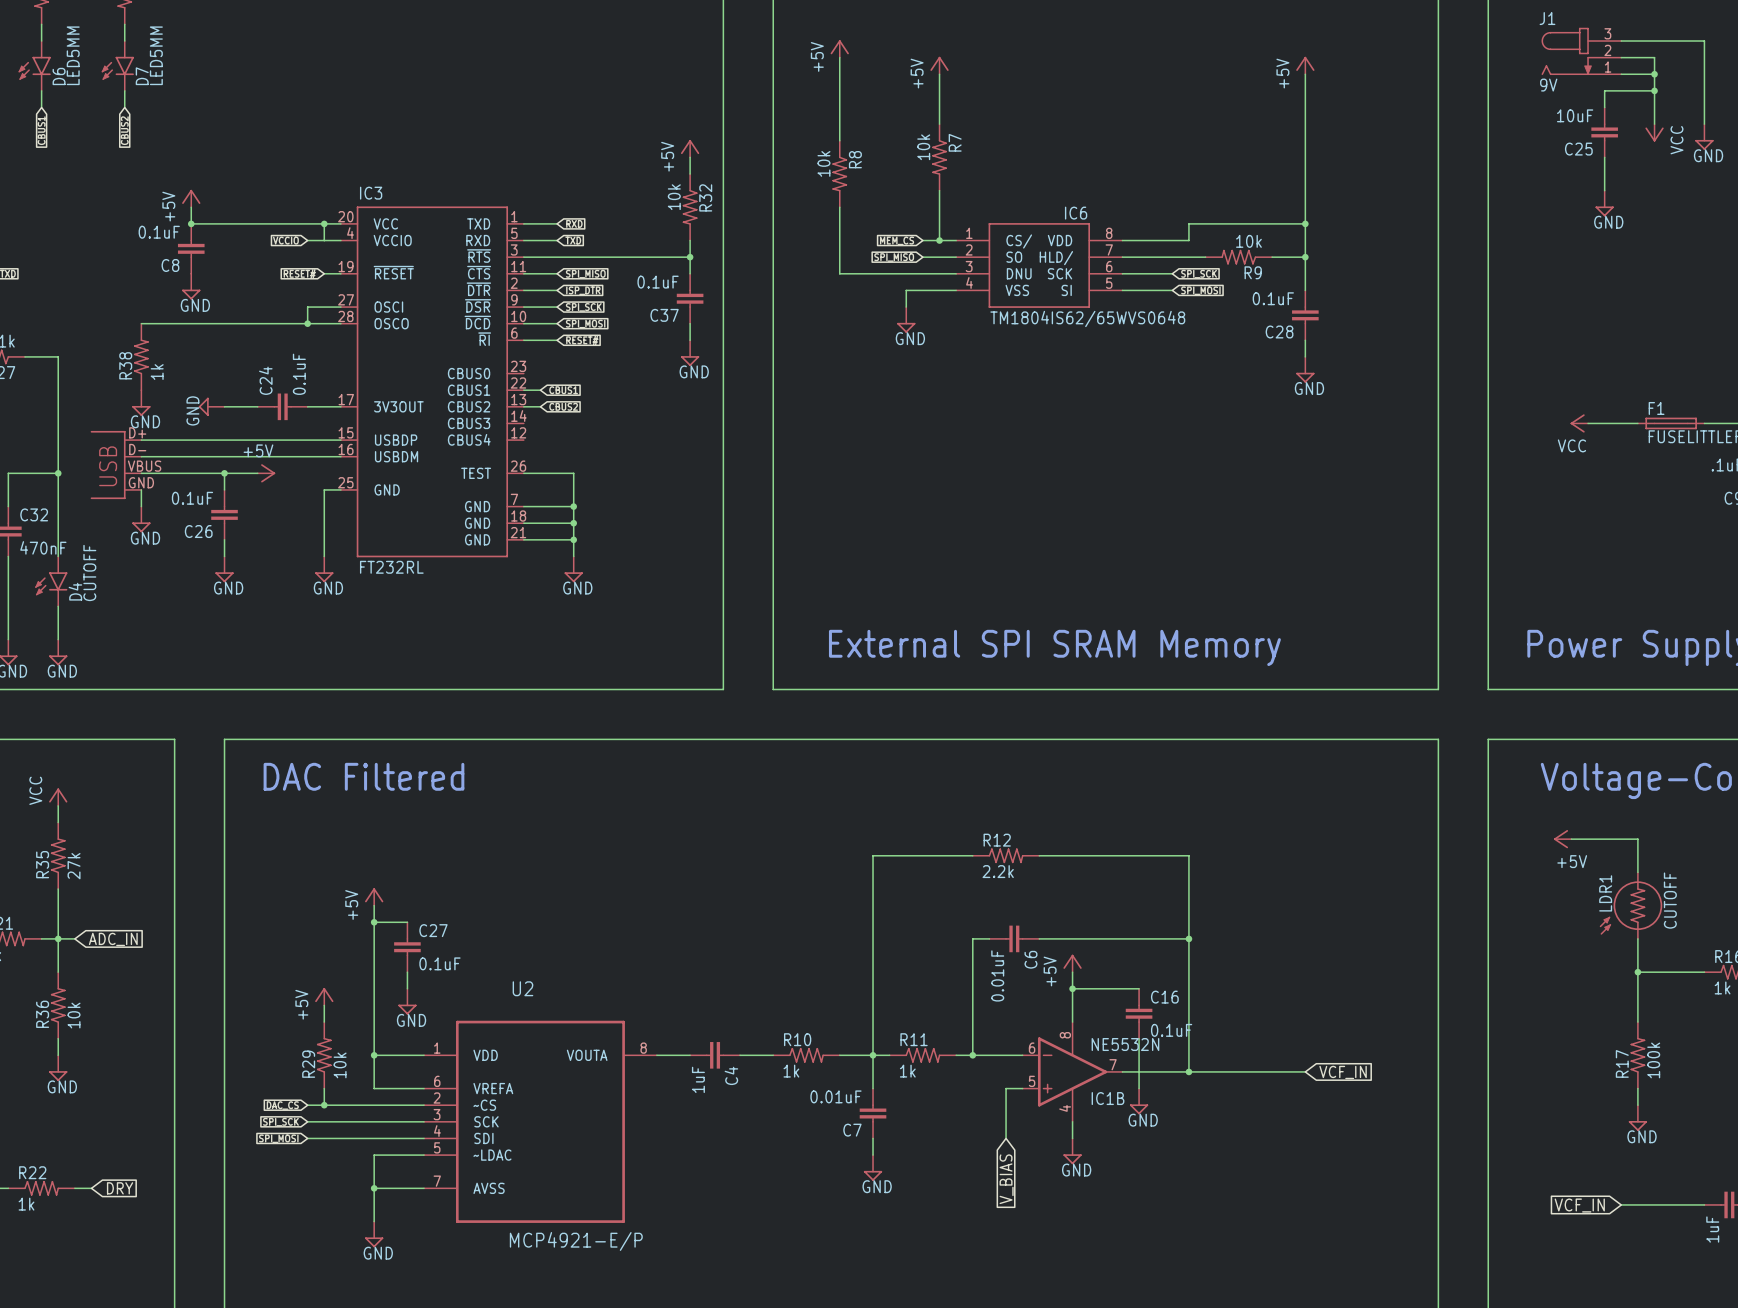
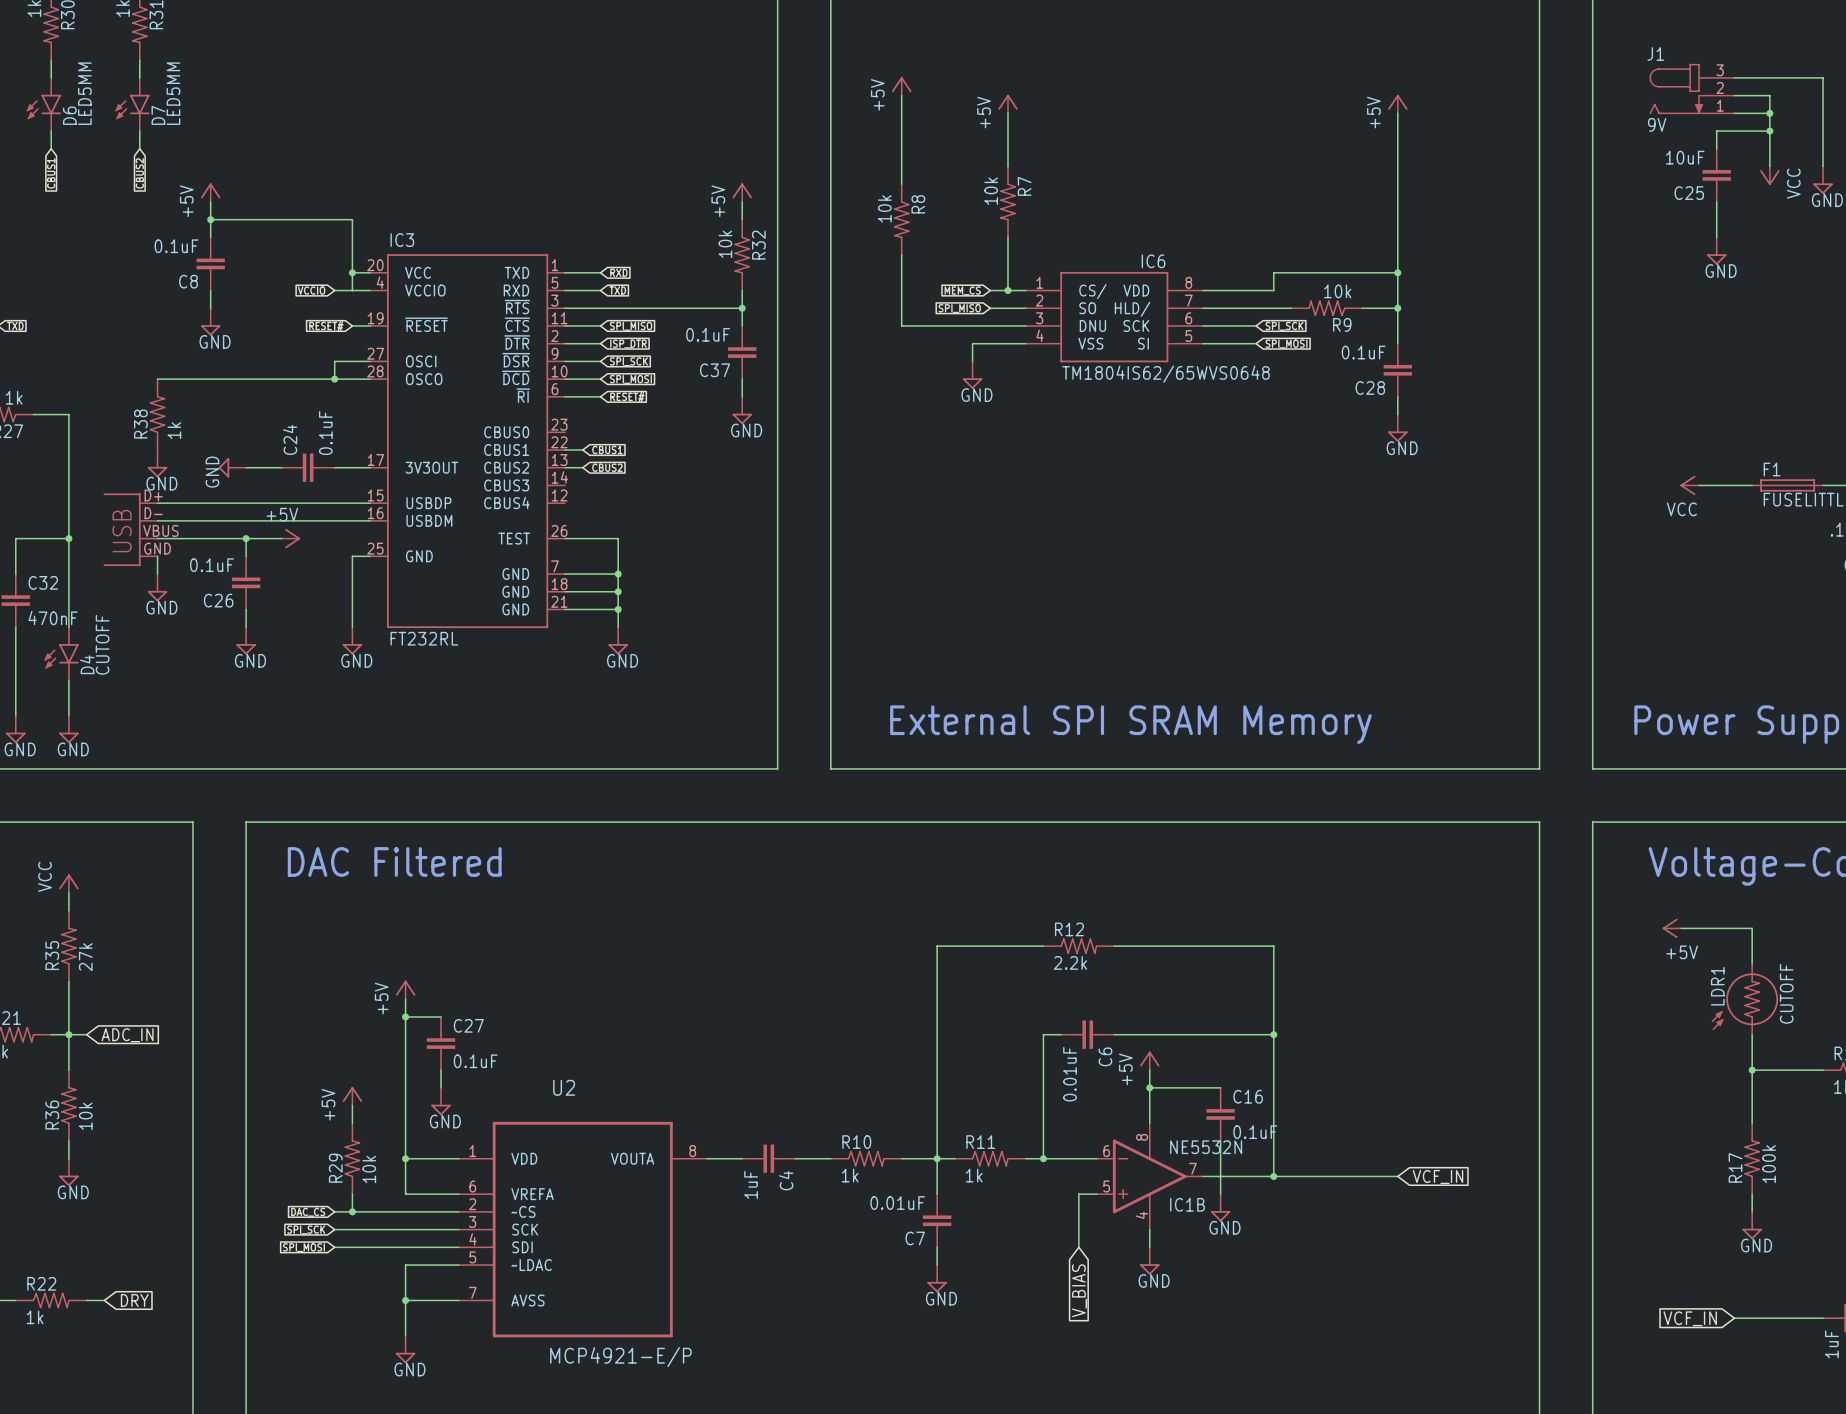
wire: none -> (210, 201) (210, 237)
junction: none -> (210, 219)
power symbol position: +5V (191, 198) -> +5V (210, 192)
wire: (191, 207) (191, 223) (324, 223) -> (210, 219) (352, 219) (352, 272)
junction: (191, 223) -> none
C8 position: (191, 248) -> (210, 263)
power symbol position: GND (191, 286) -> GND (210, 321)

